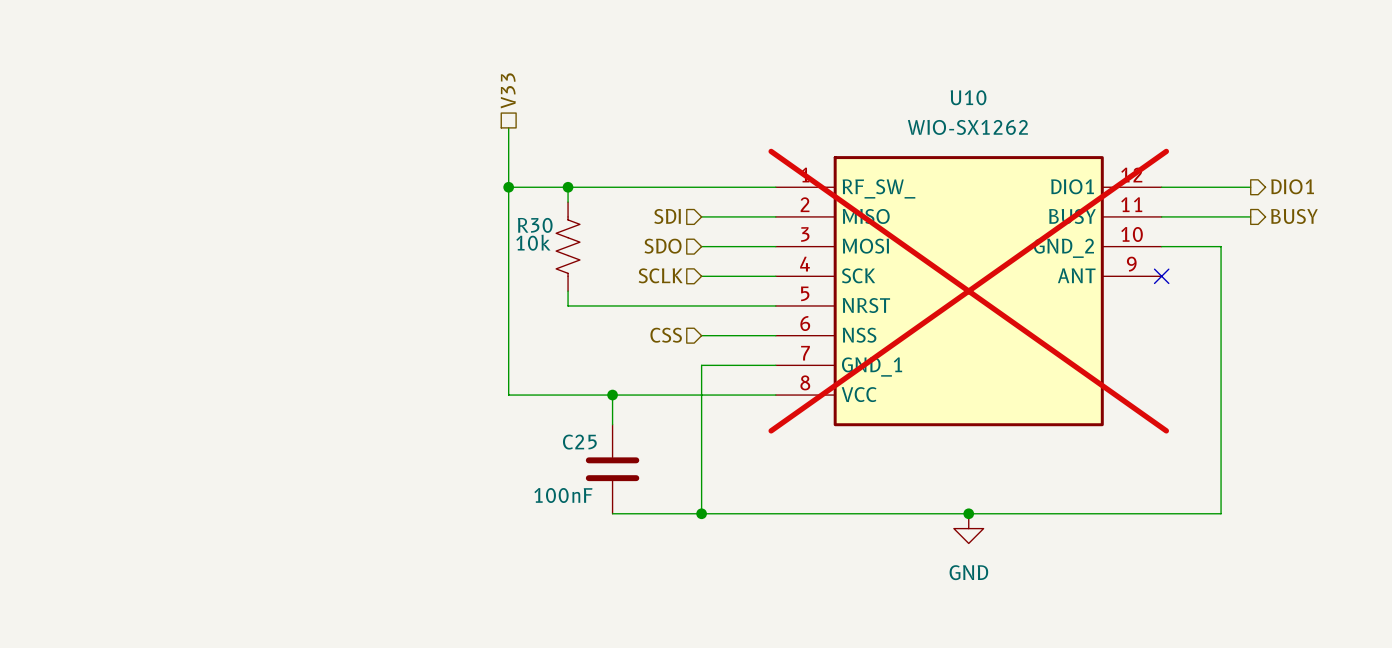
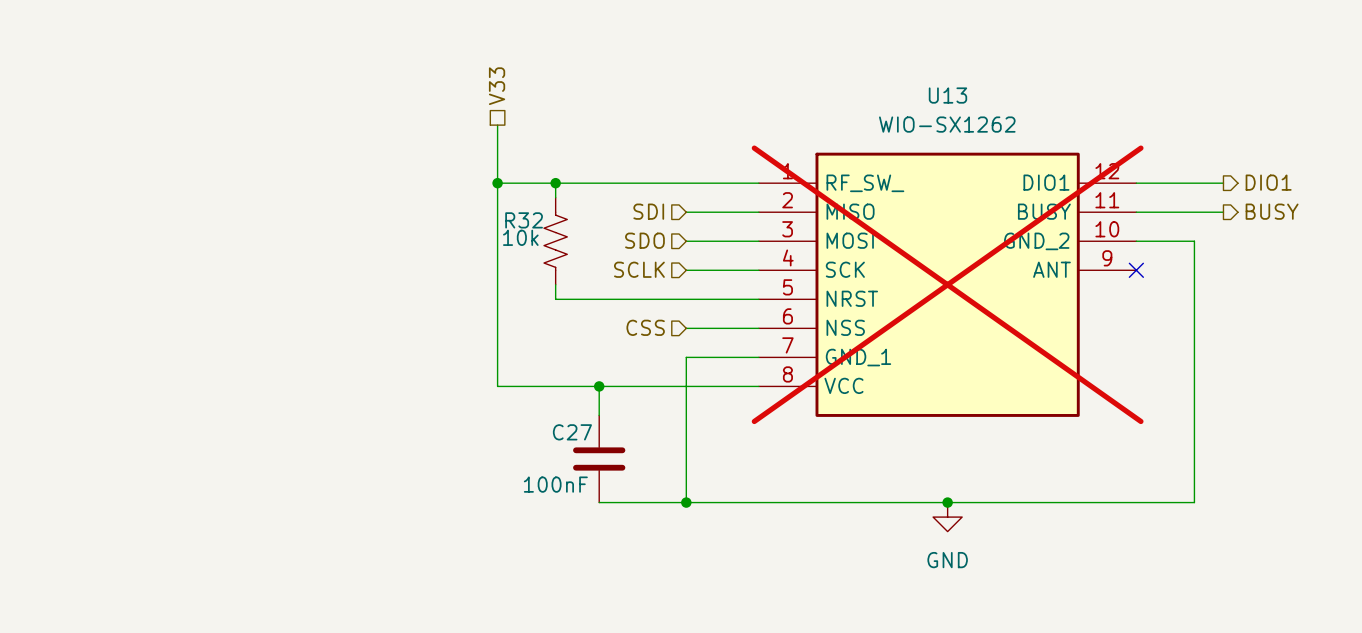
U10 name: U10 (968, 97) -> U13 (947, 95)
R30 name: R30 (535, 225) -> R32 (524, 220)
C25 name: C25 (579, 442) -> C27 (572, 432)

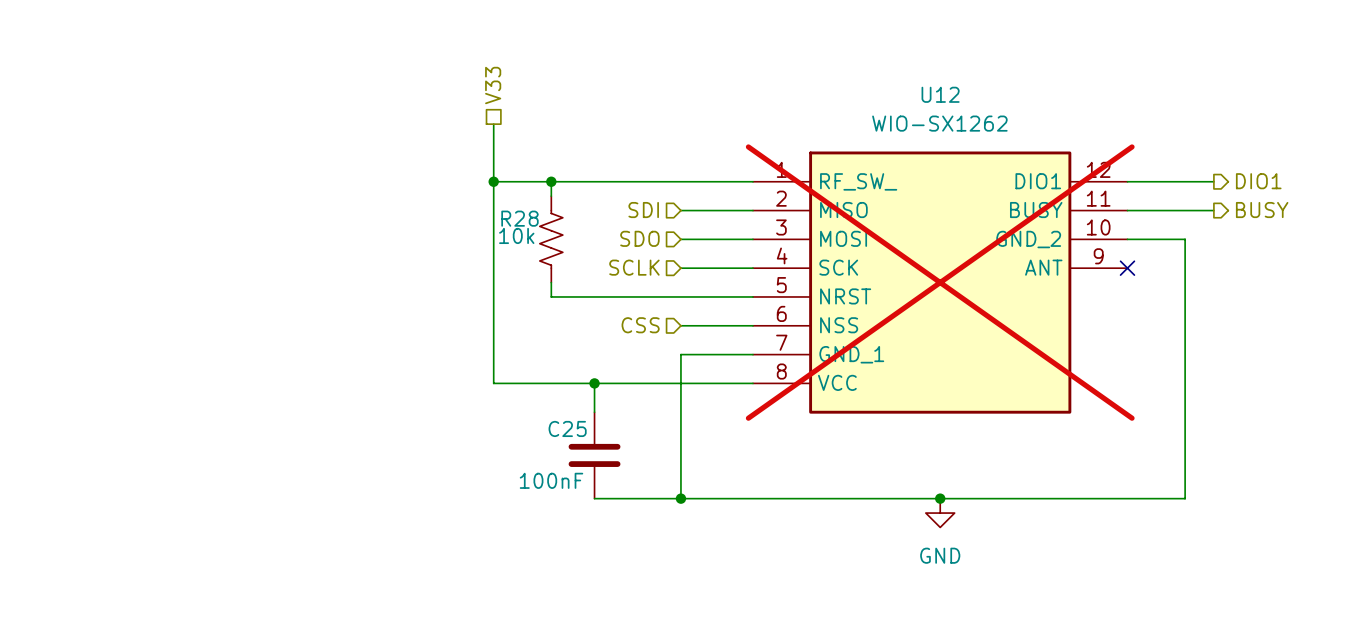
U13 name: U13 (947, 95) -> U12 (940, 94)
R32 name: R32 (524, 220) -> R28 (519, 218)
C27 name: C27 (572, 432) -> C25 (567, 428)

